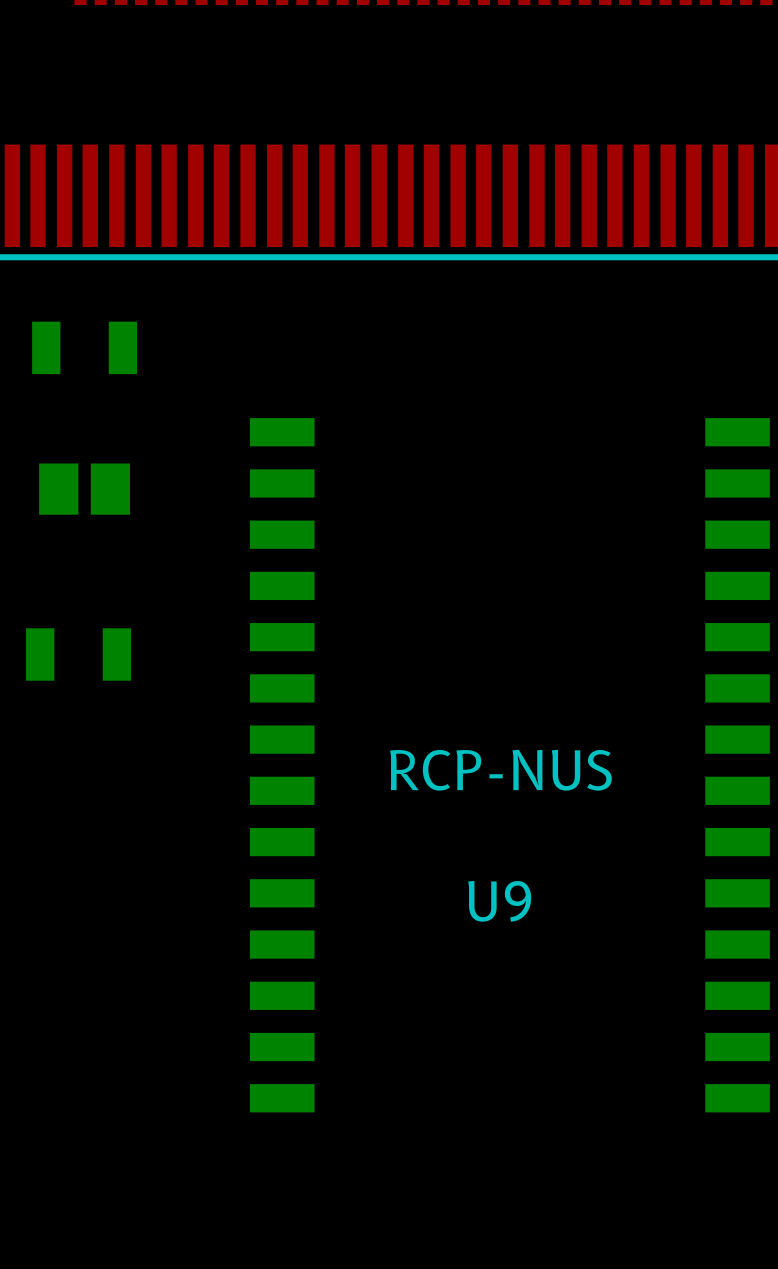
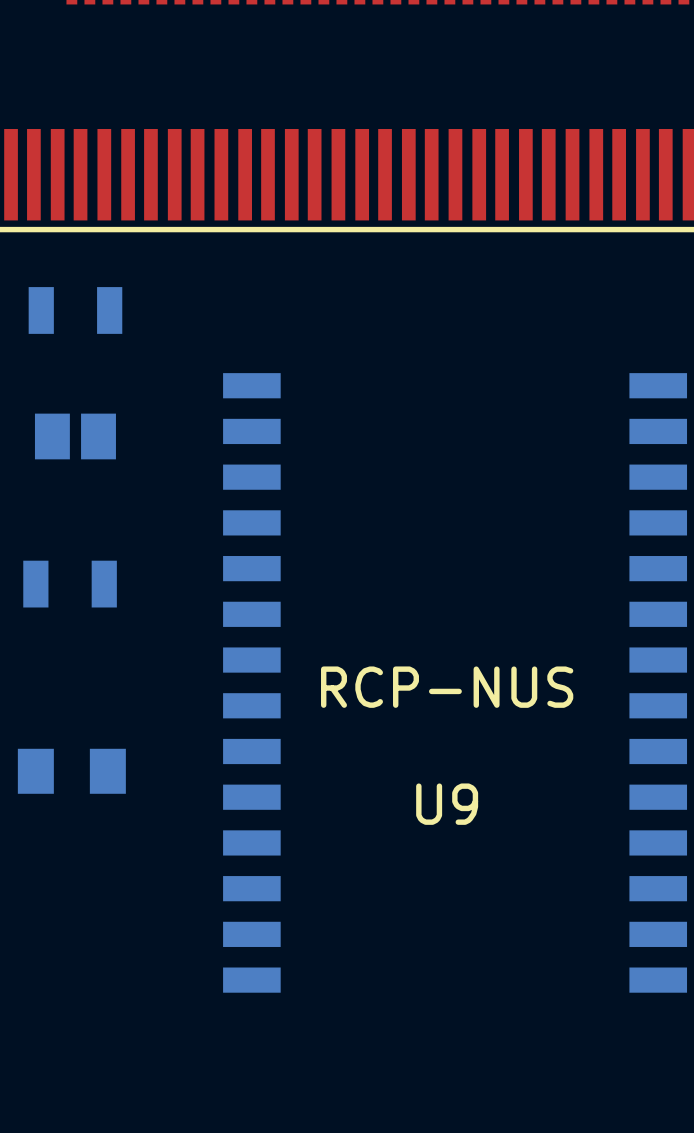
part: none -> (71, 771)

